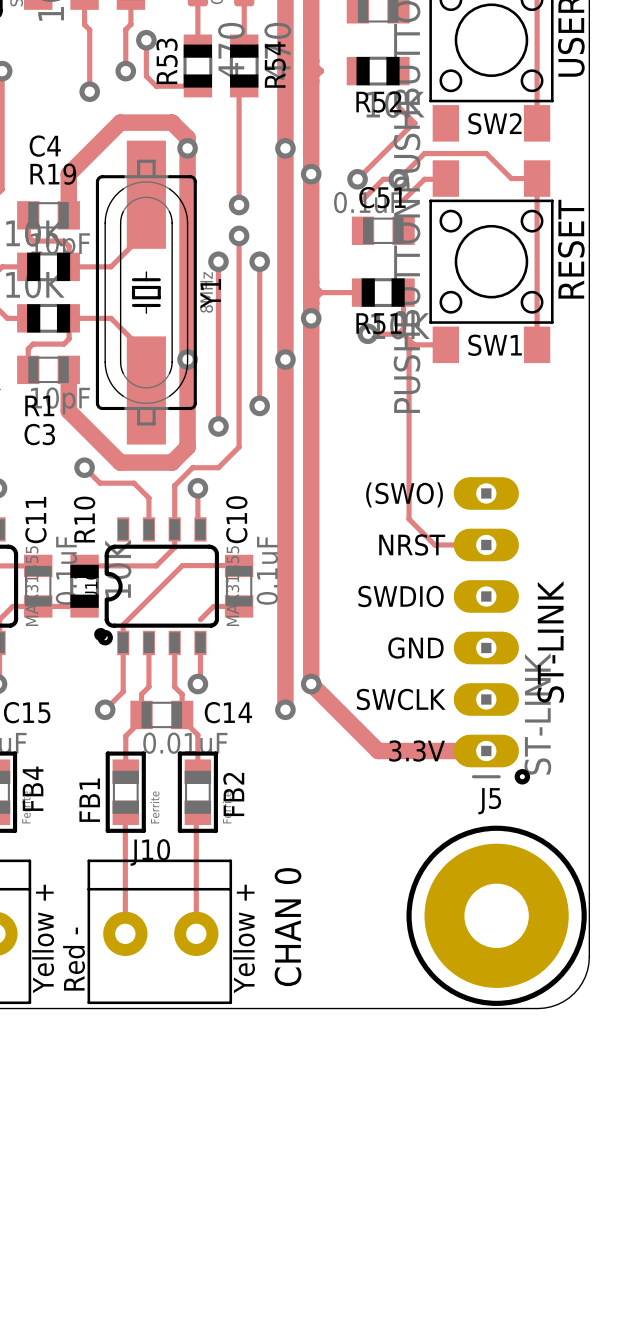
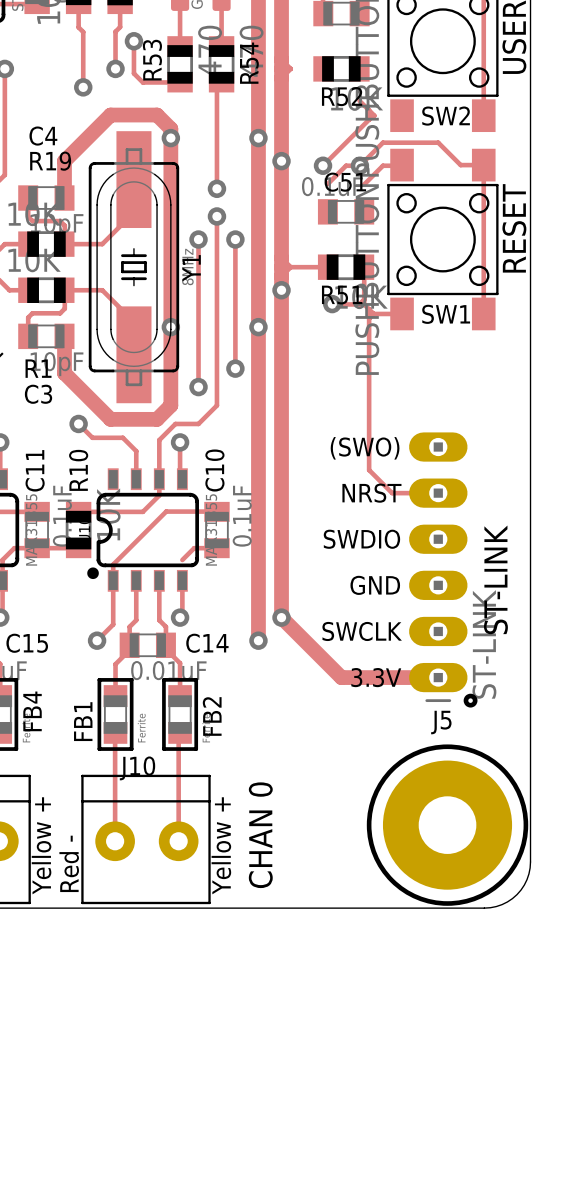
drawing: [97, 629, 113, 646] -> none

